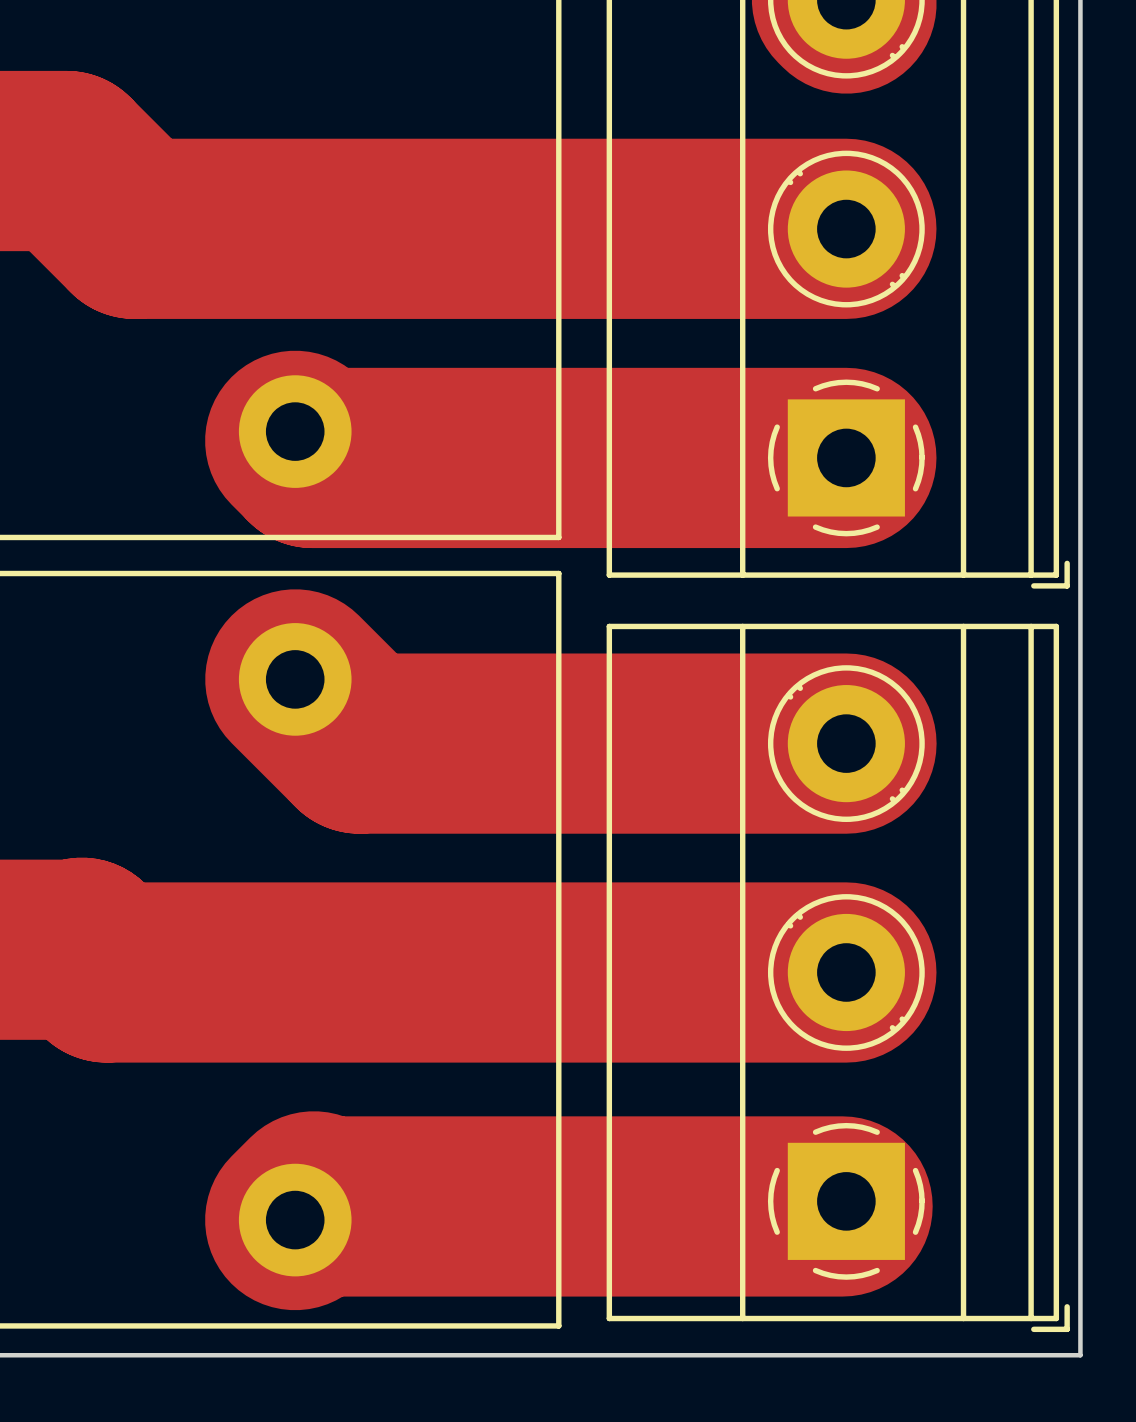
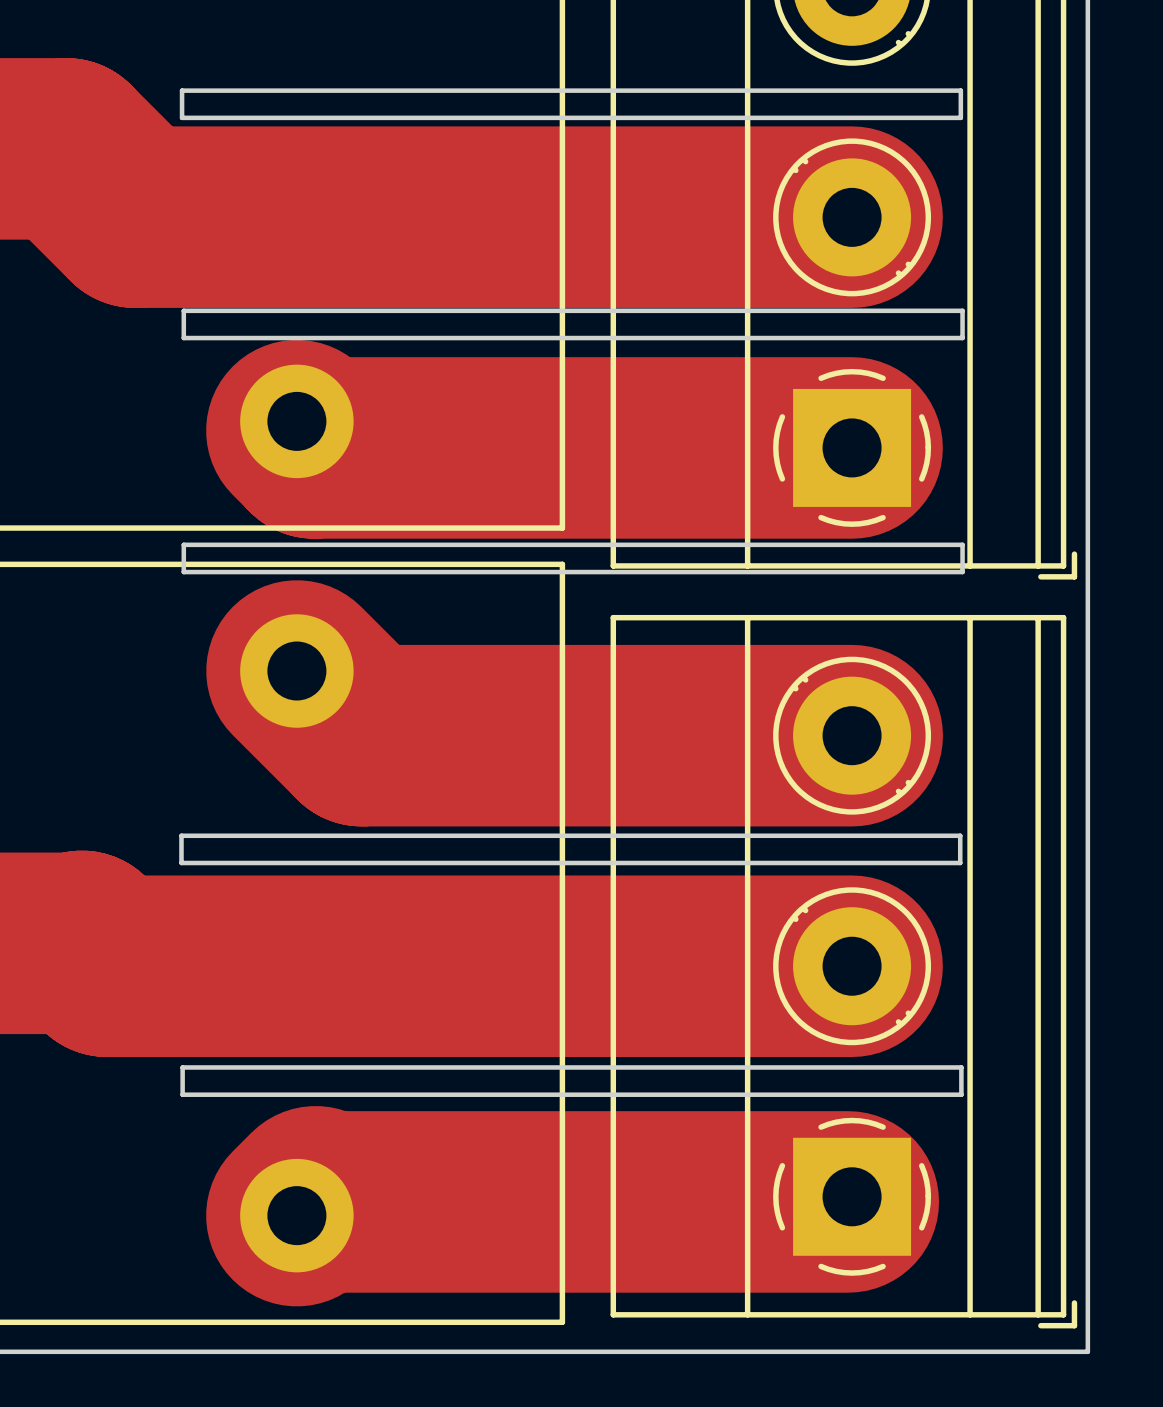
board edge: none -> (182, 90) (960, 90) (960, 117) (182, 117) (182, 90)
board edge: none -> (183, 310) (962, 310) (962, 338) (183, 338) (183, 310)
board edge: none -> (183, 544) (183, 572) (962, 572) (962, 544) (183, 544)
board edge: none -> (181, 835) (960, 835) (960, 863) (181, 863) (181, 835)
board edge: none -> (182, 1067) (961, 1067) (961, 1094) (182, 1094) (182, 1067)

